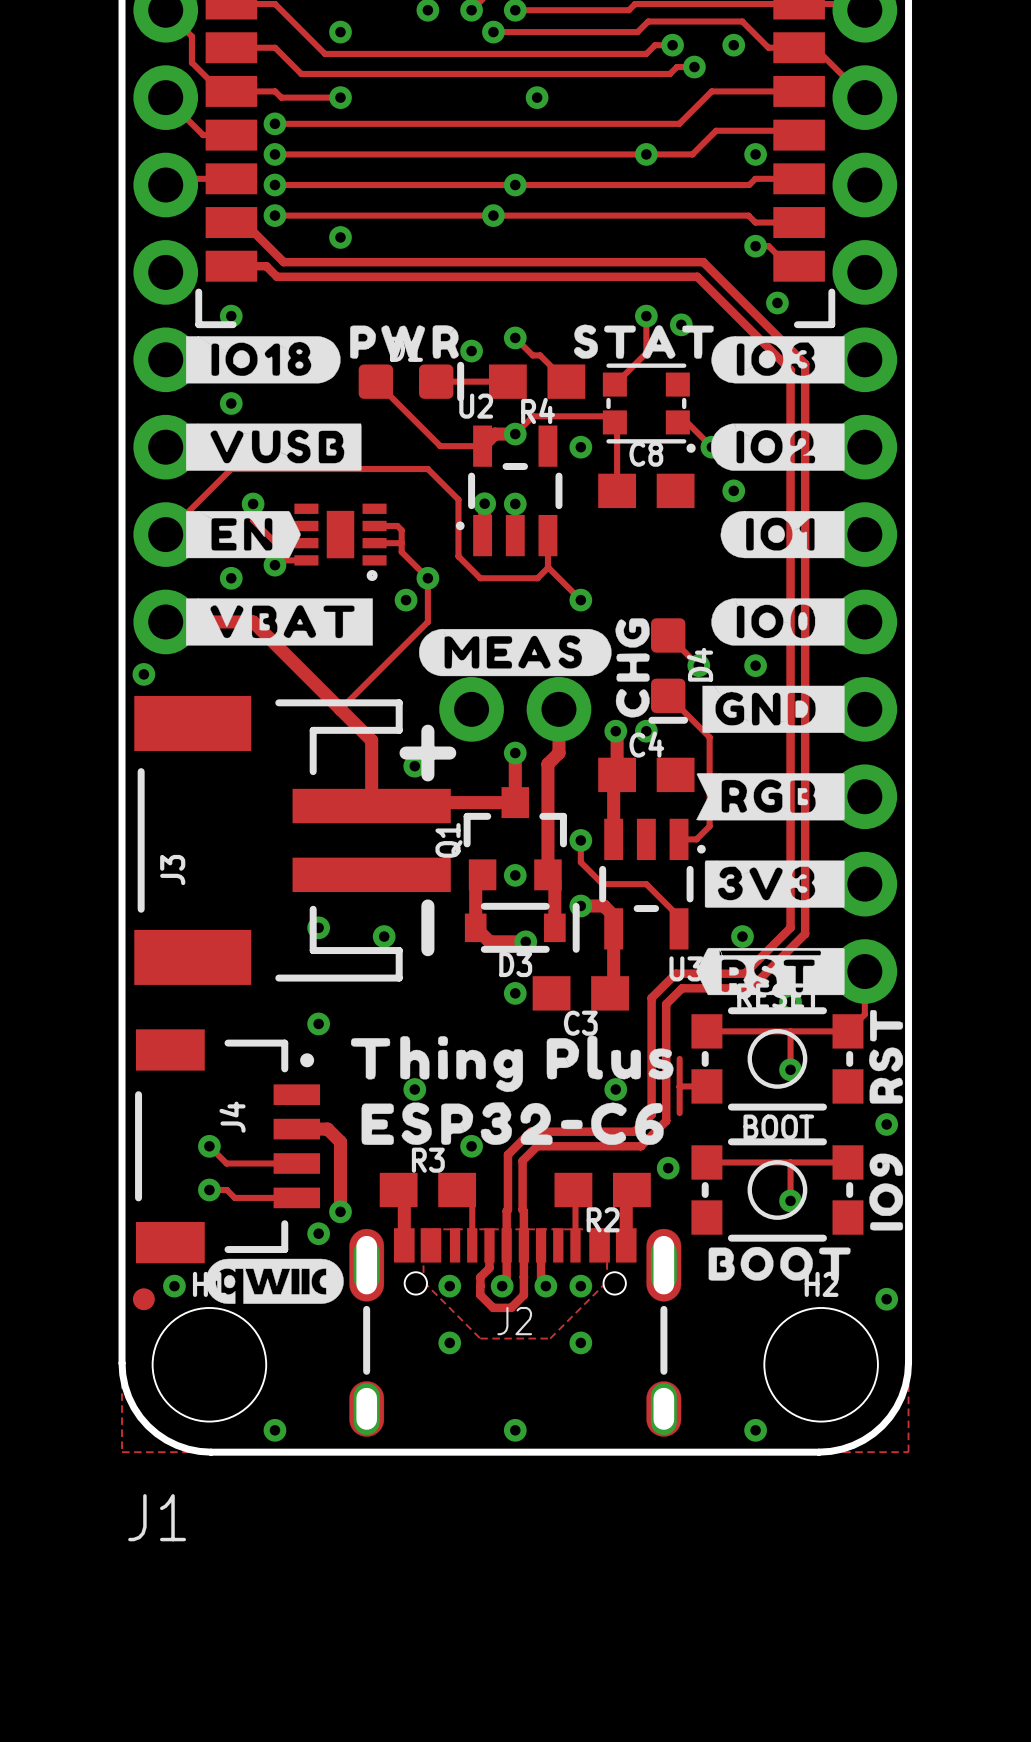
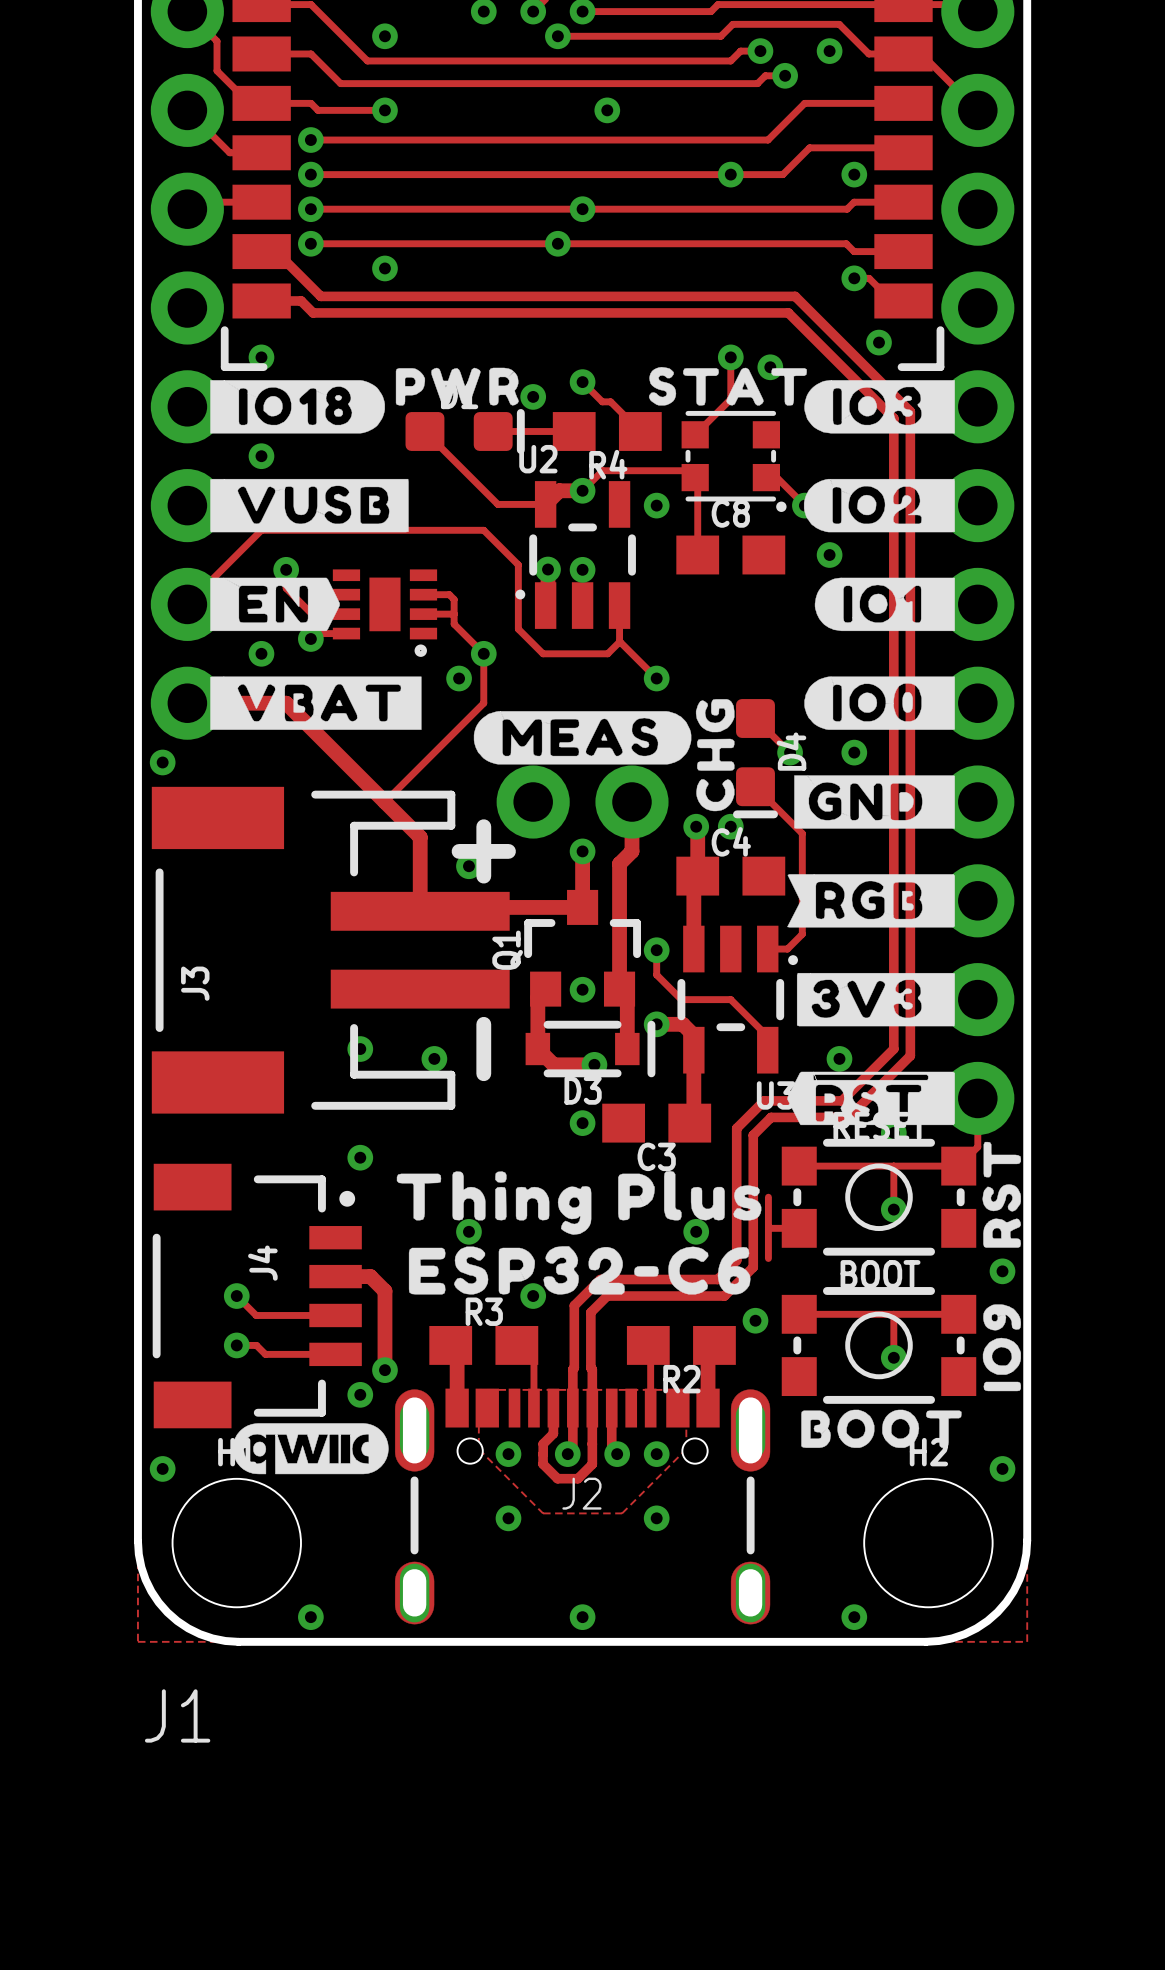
via position: (174, 1286) -> (162, 1468)
part: (143, 1299) -> none

